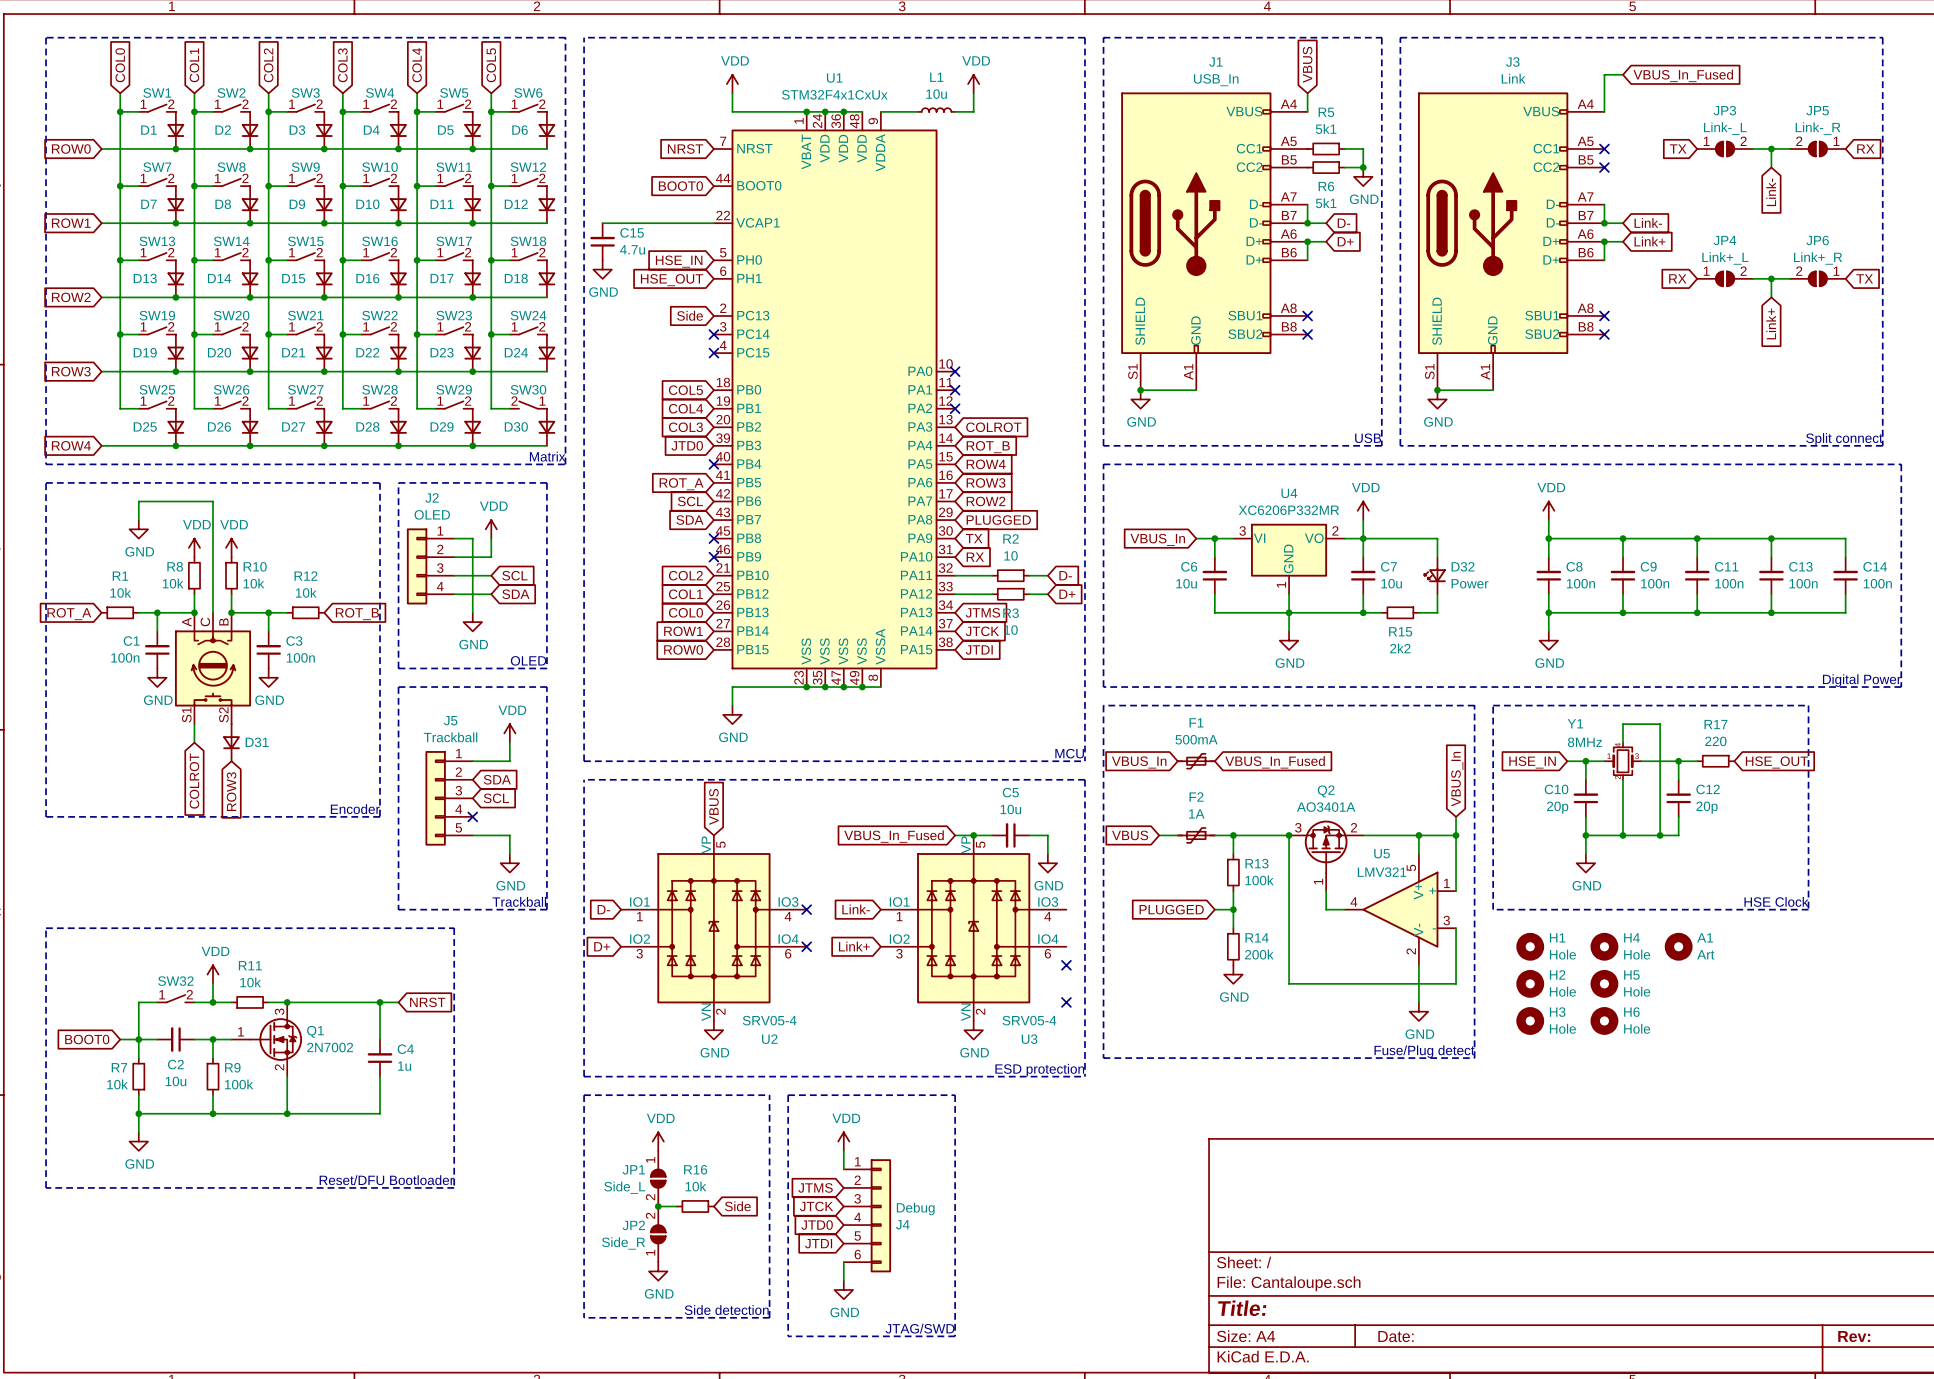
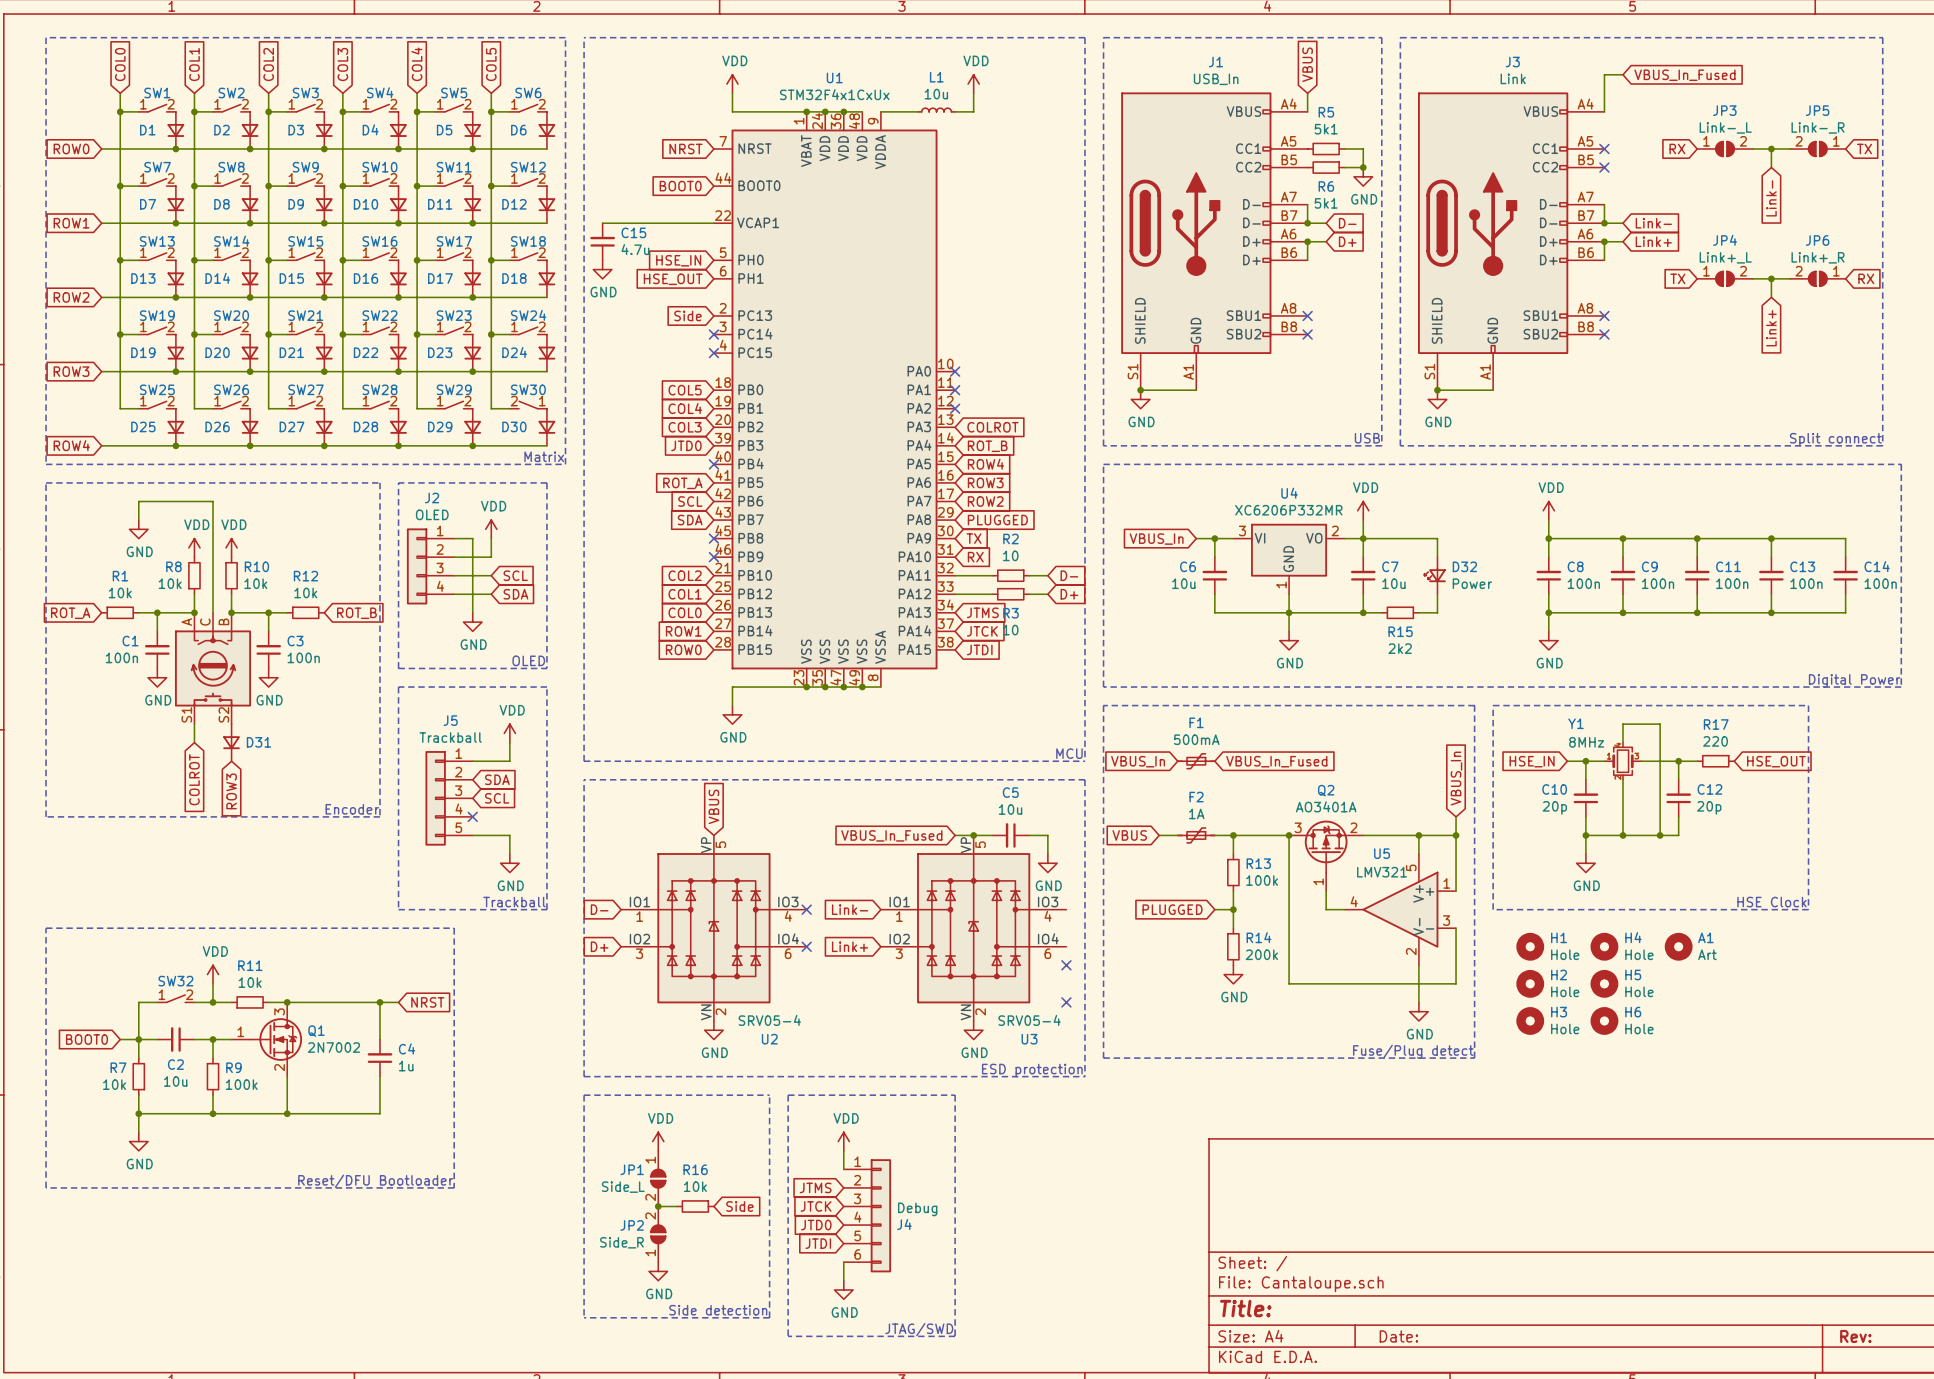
global label: TX (1678, 149) -> RX (1677, 149)
global label: RX (1865, 149) -> TX (1864, 149)
global label: RX (1677, 278) -> TX (1677, 278)
global label: TX (1864, 278) -> RX (1866, 278)

